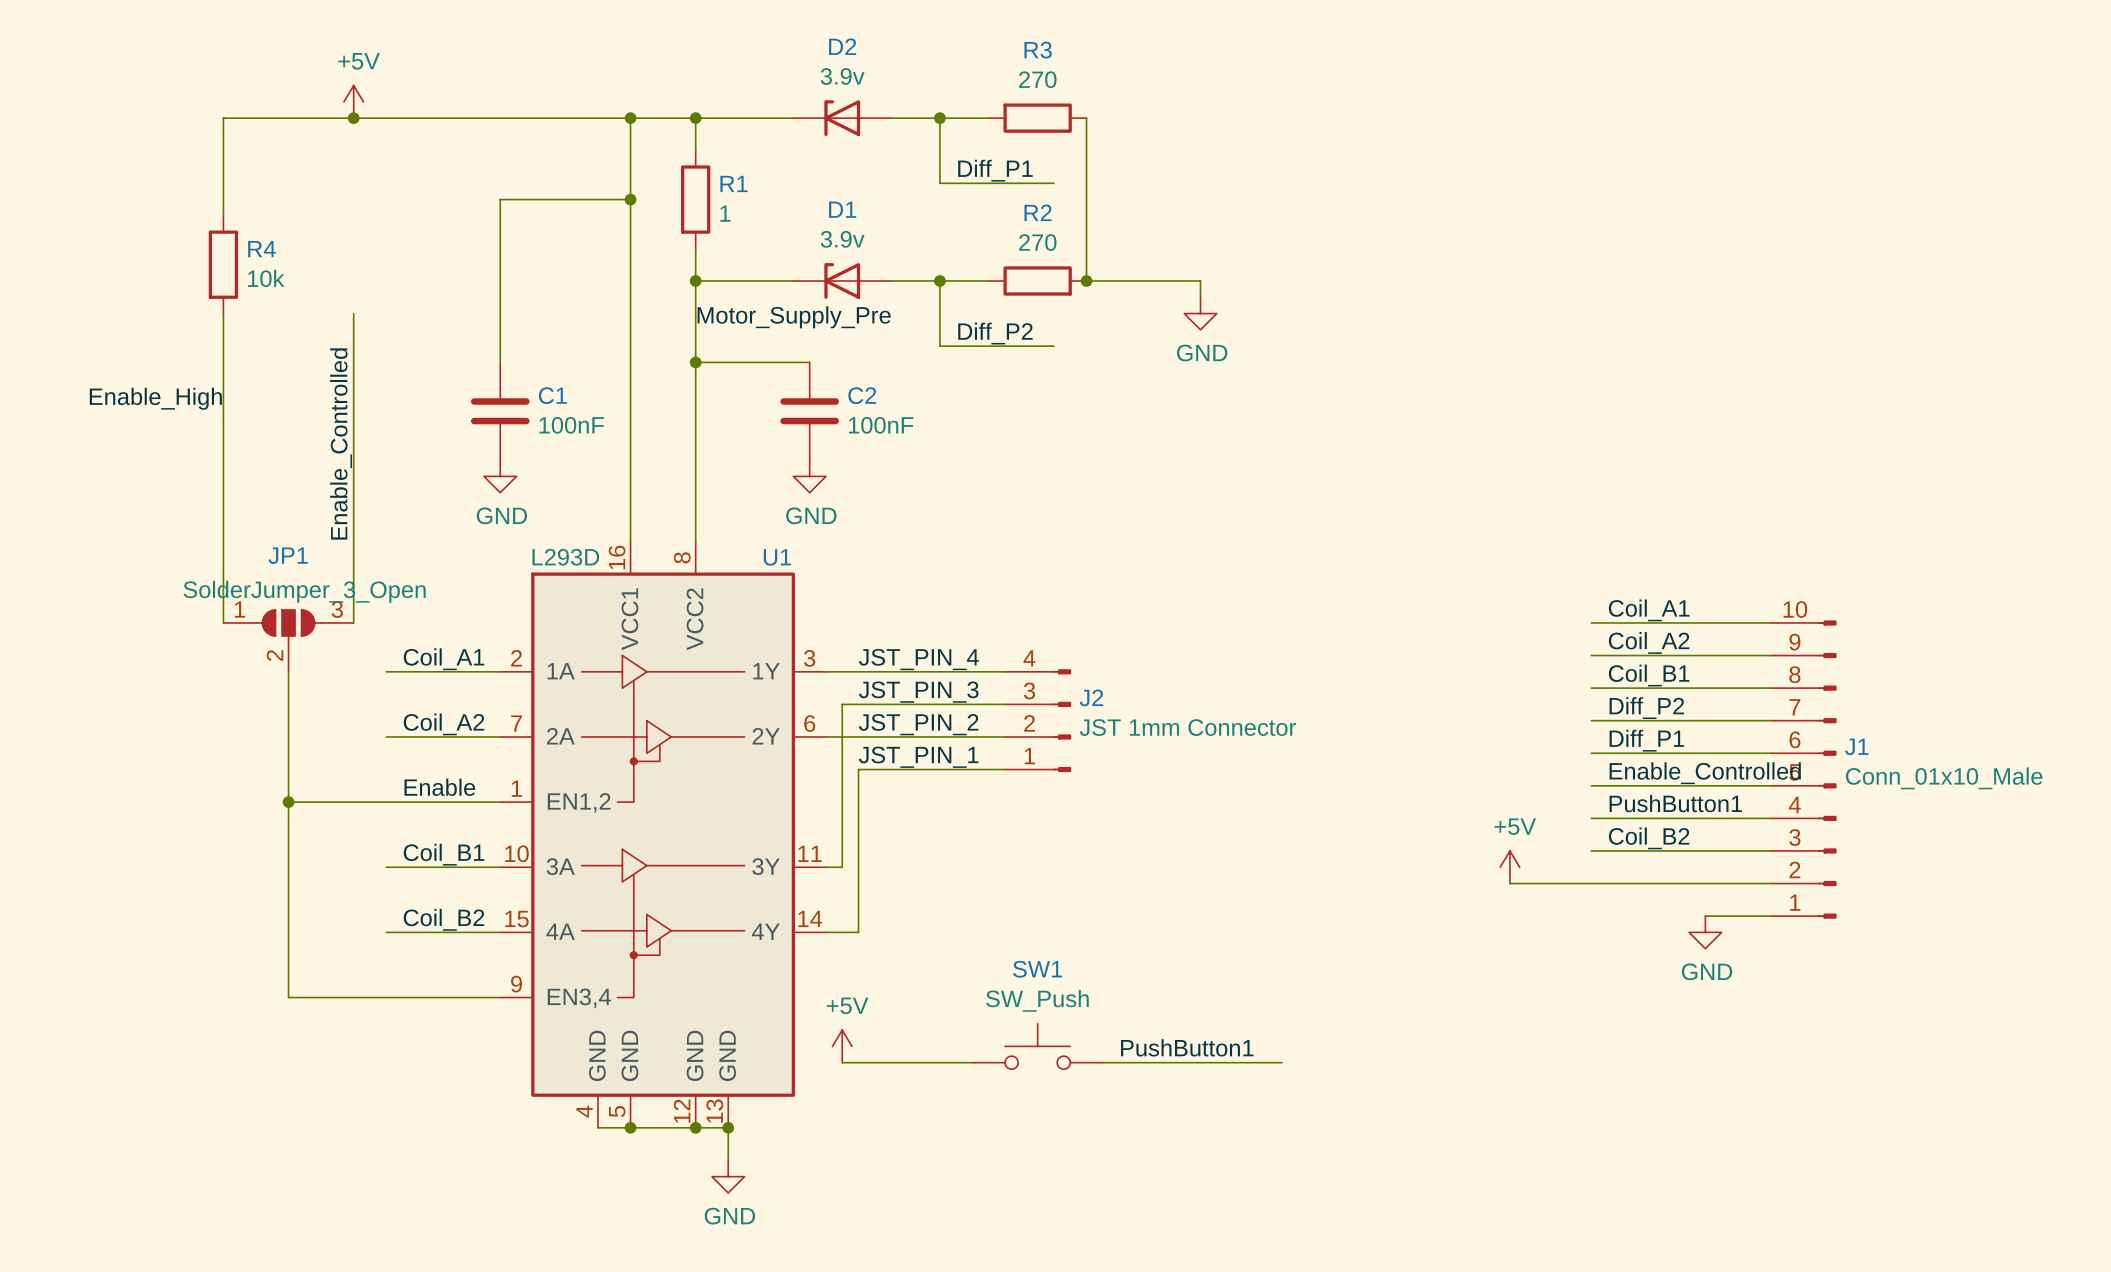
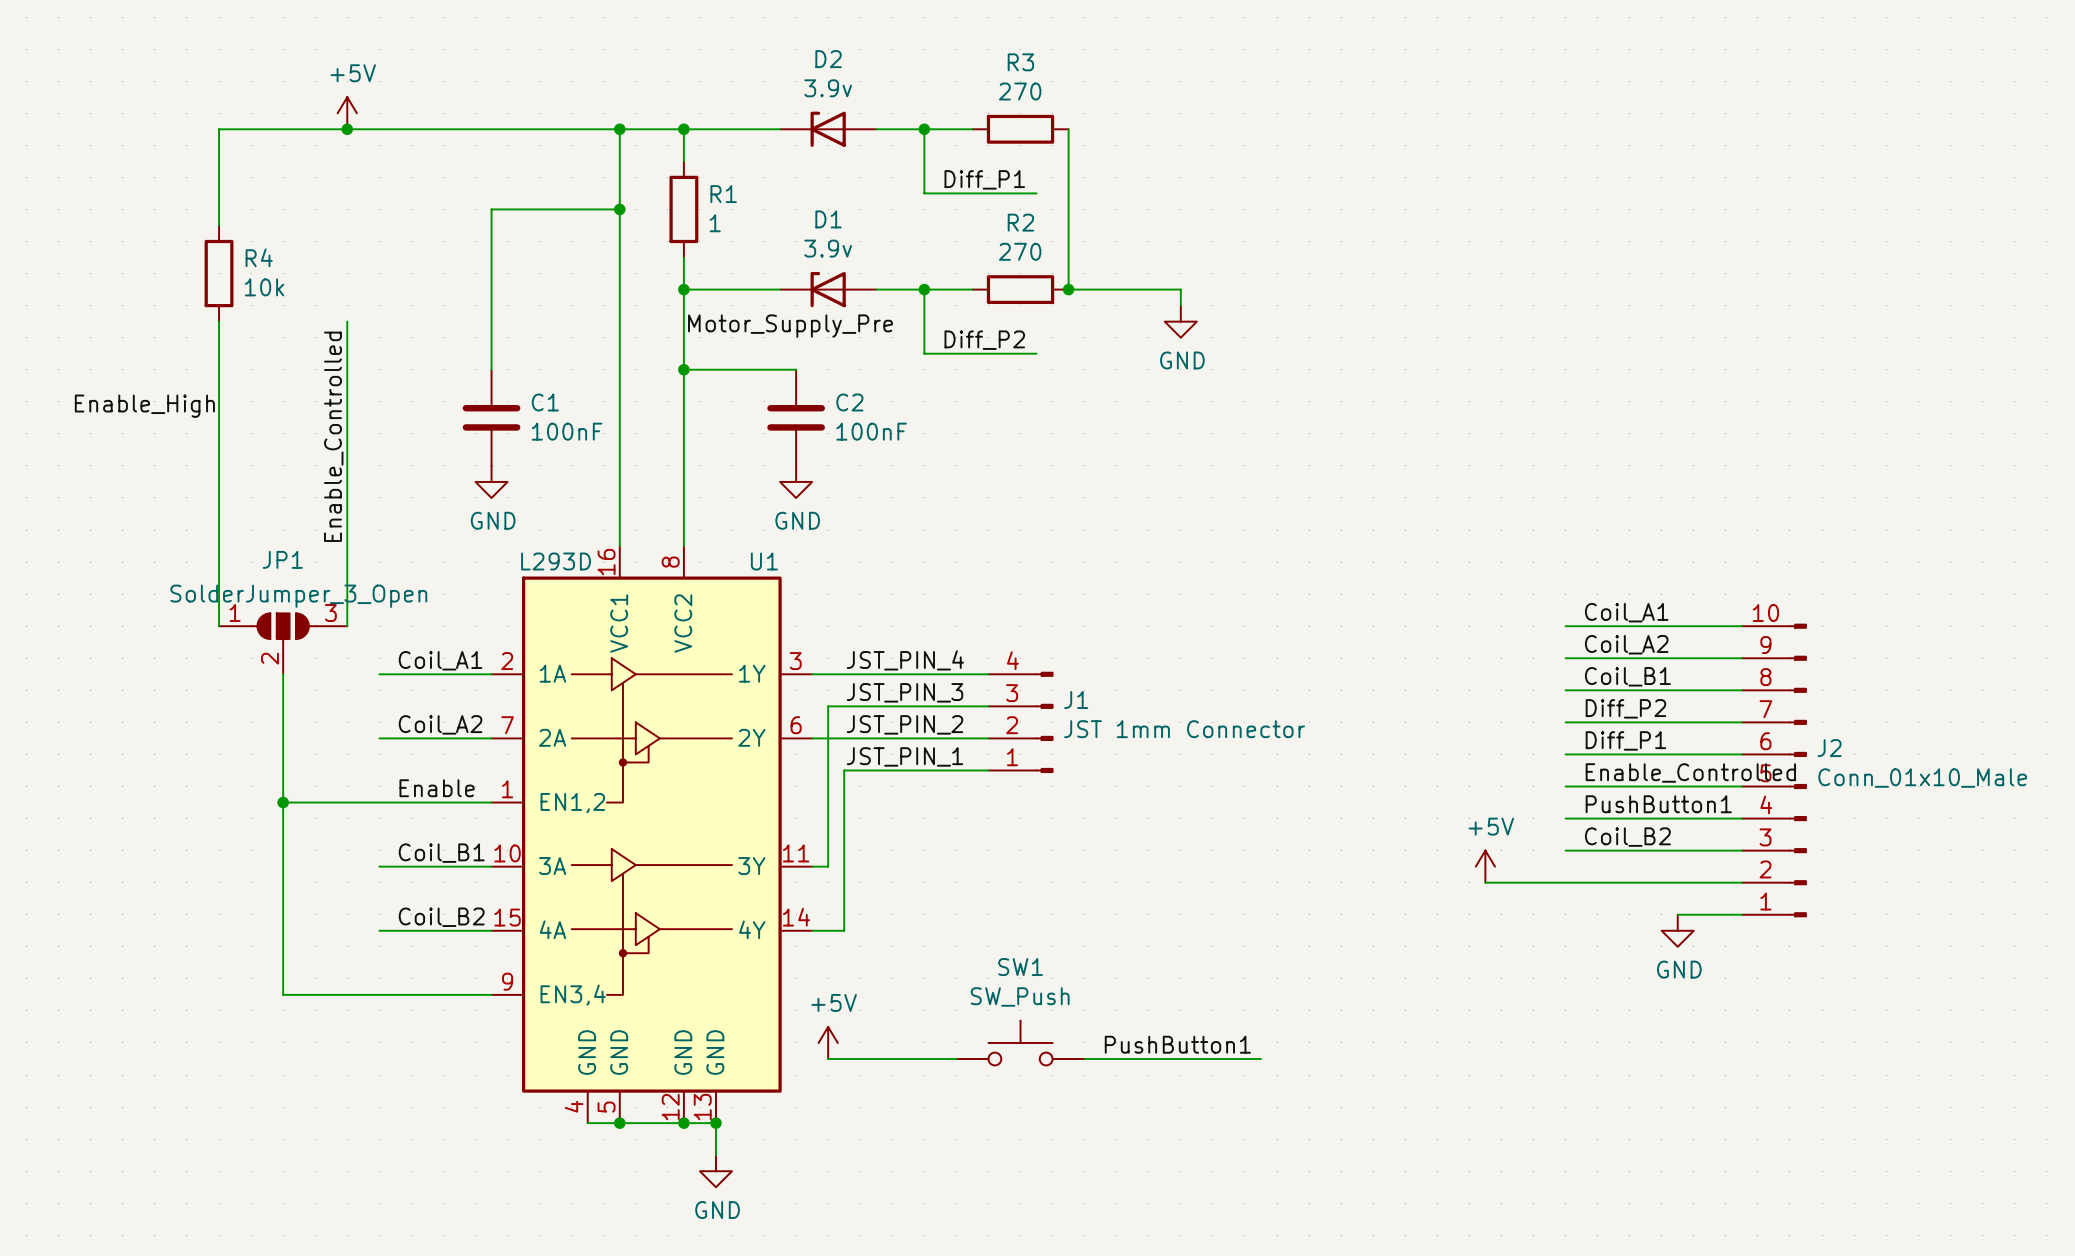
J2 name: J2 (1091, 697) -> J1 (1076, 699)
J1 name: J1 (1856, 746) -> J2 (1829, 748)

